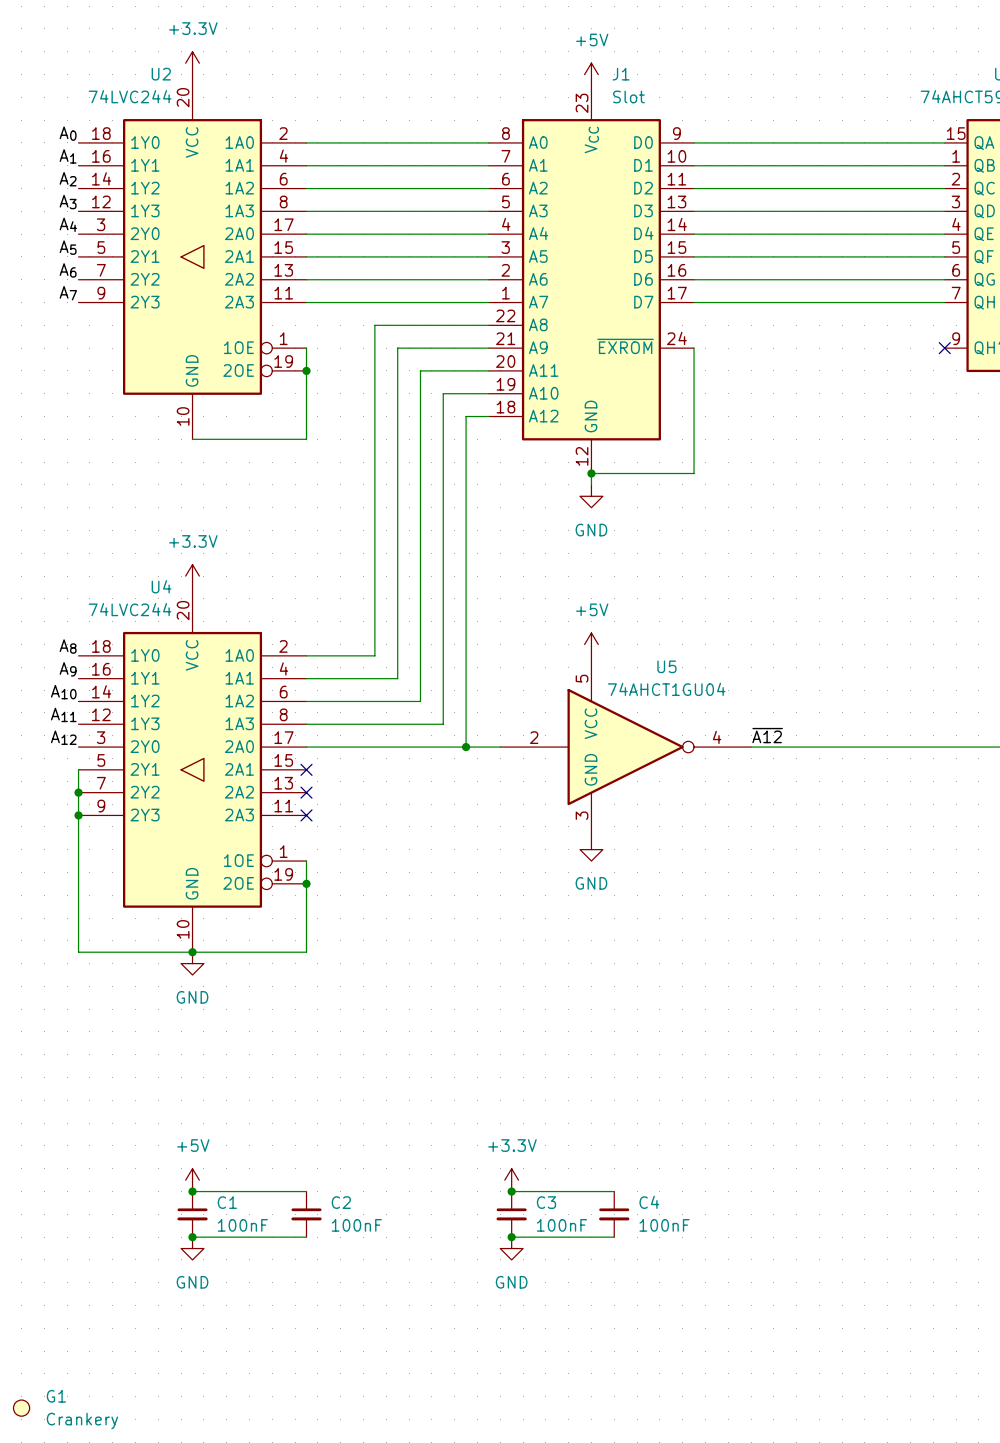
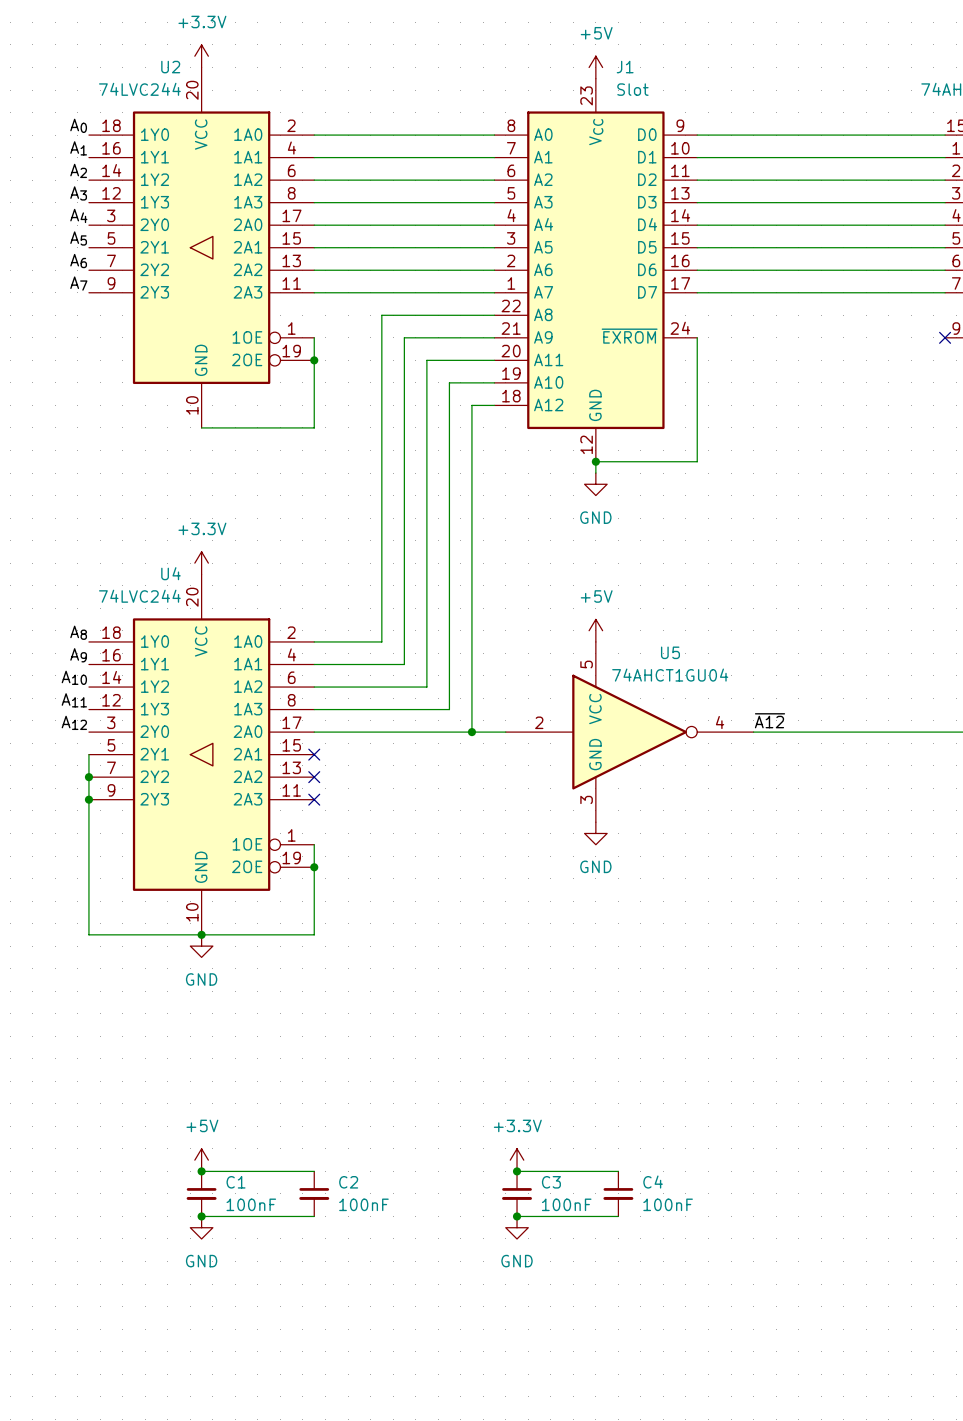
G1: Crankery (21, 1408) -> none

